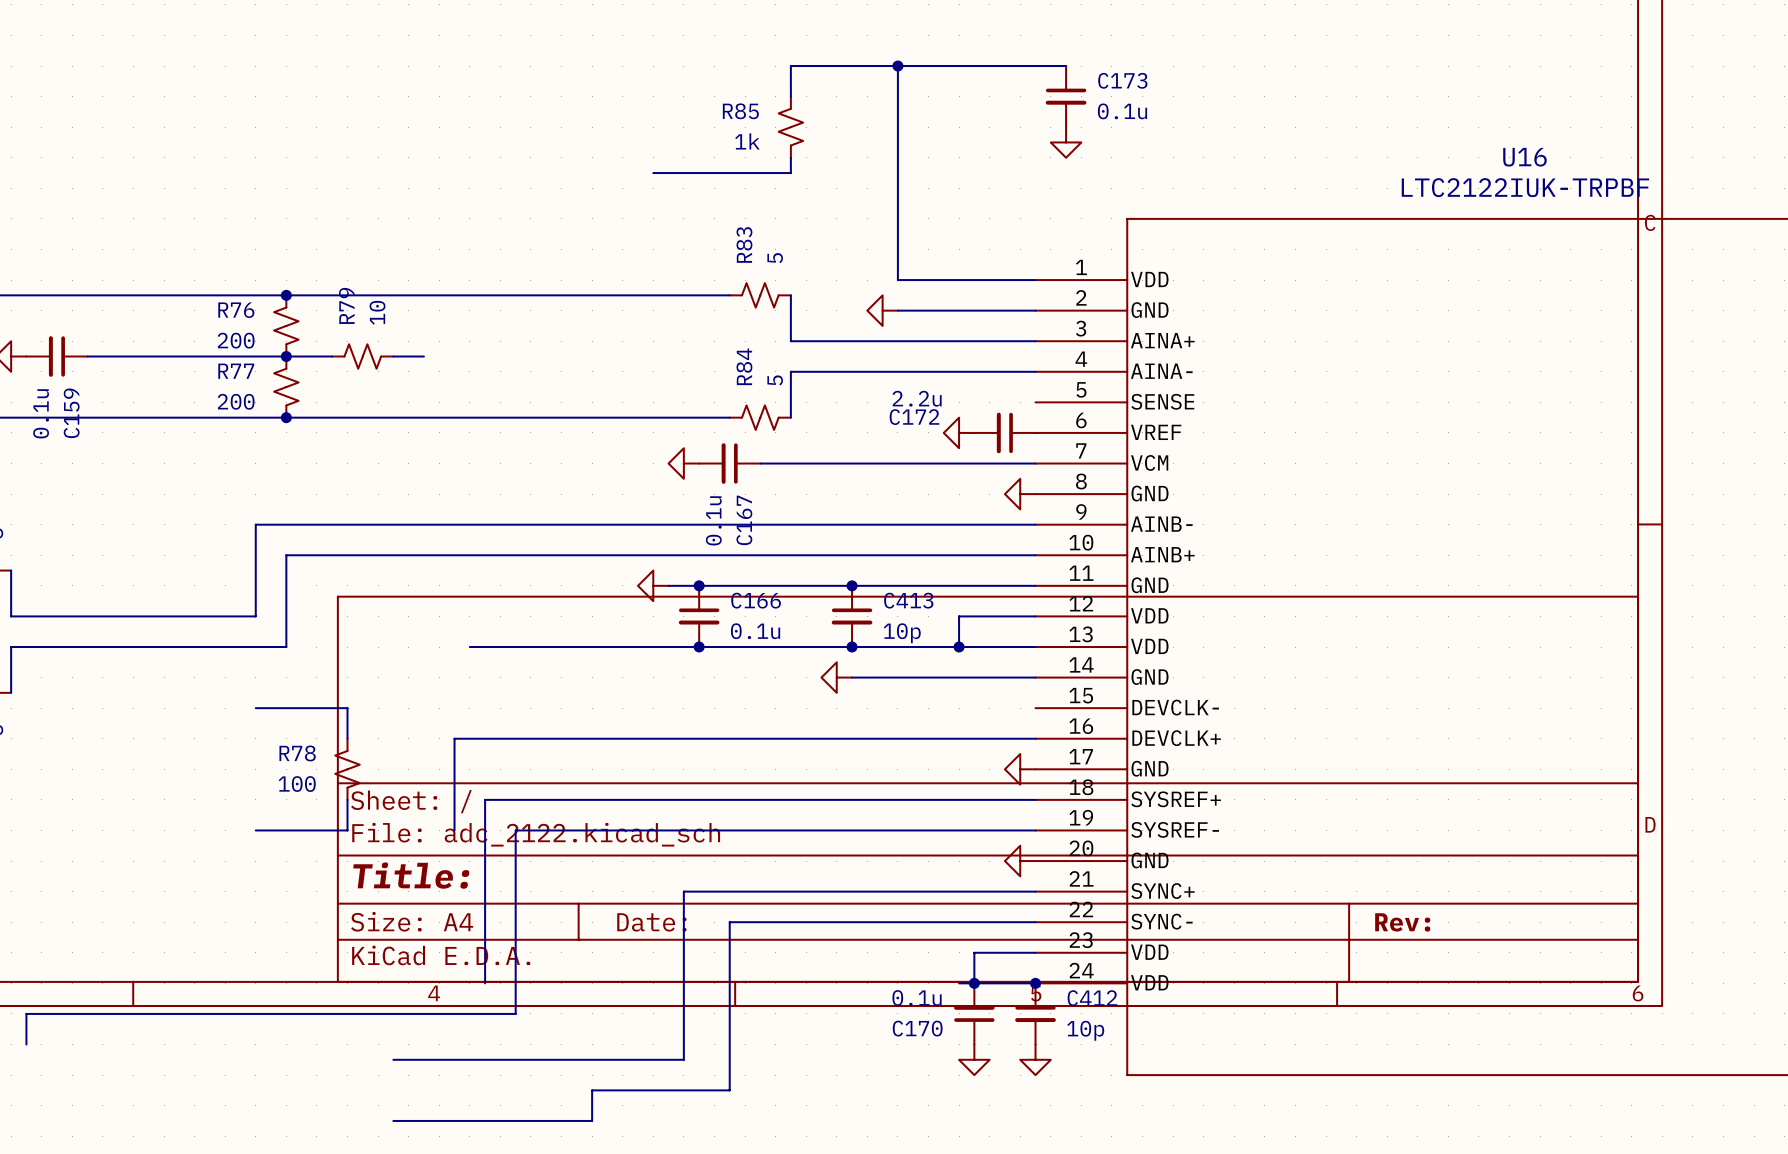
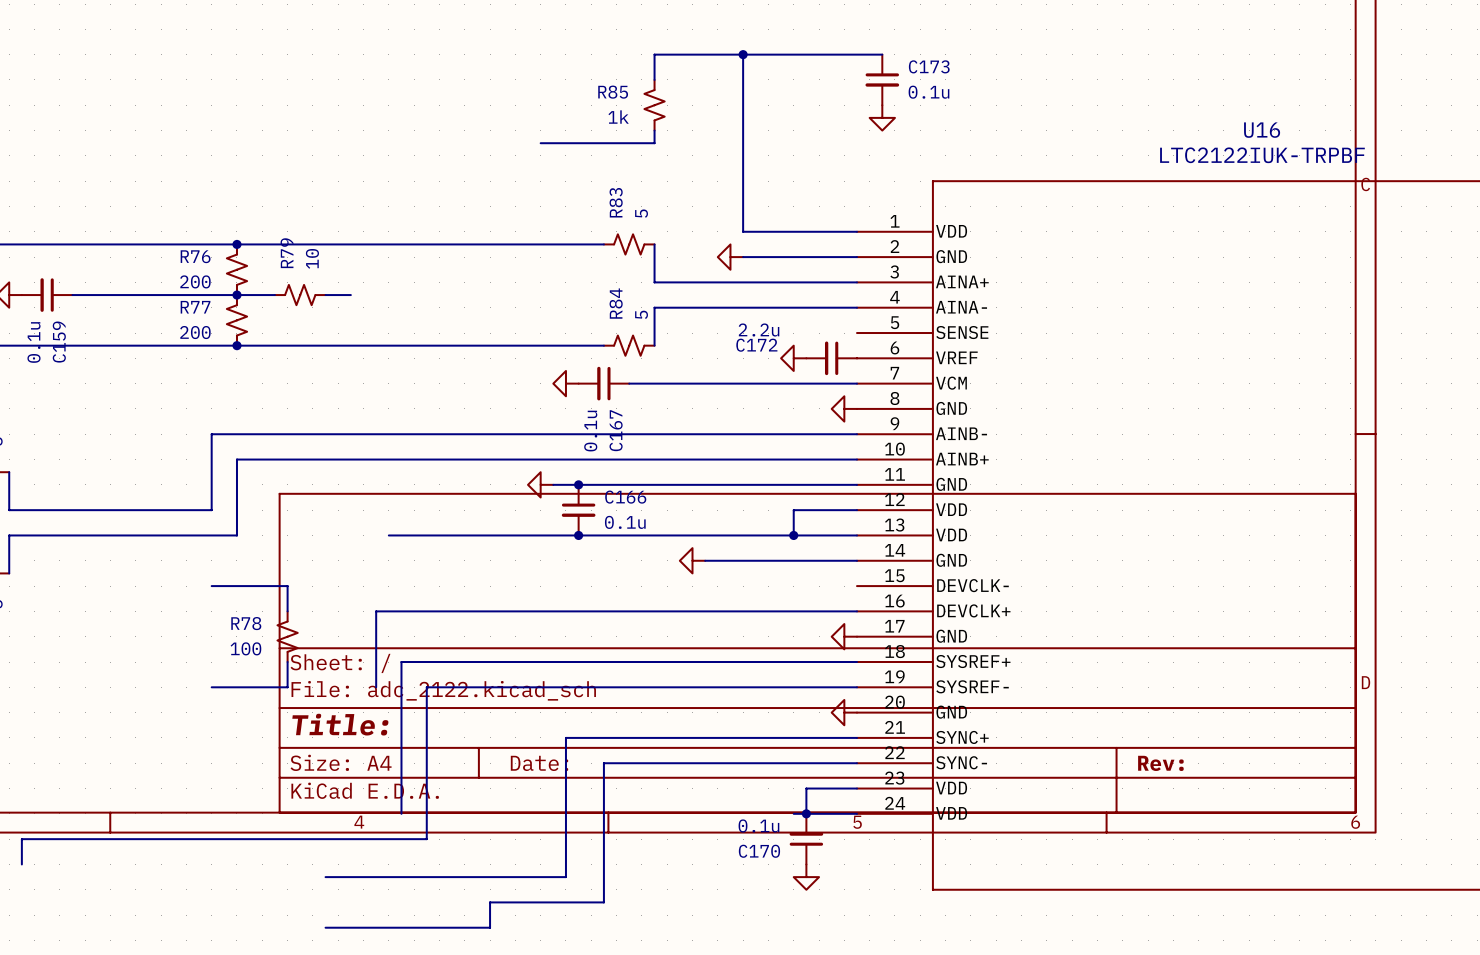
junction: (852, 585) -> none
C413: 10p (852, 616) -> none
junction: (852, 647) -> none
junction: (1035, 983) -> none
C412: 10p (1035, 1013) -> none
power symbol: (1035, 1059) -> none

